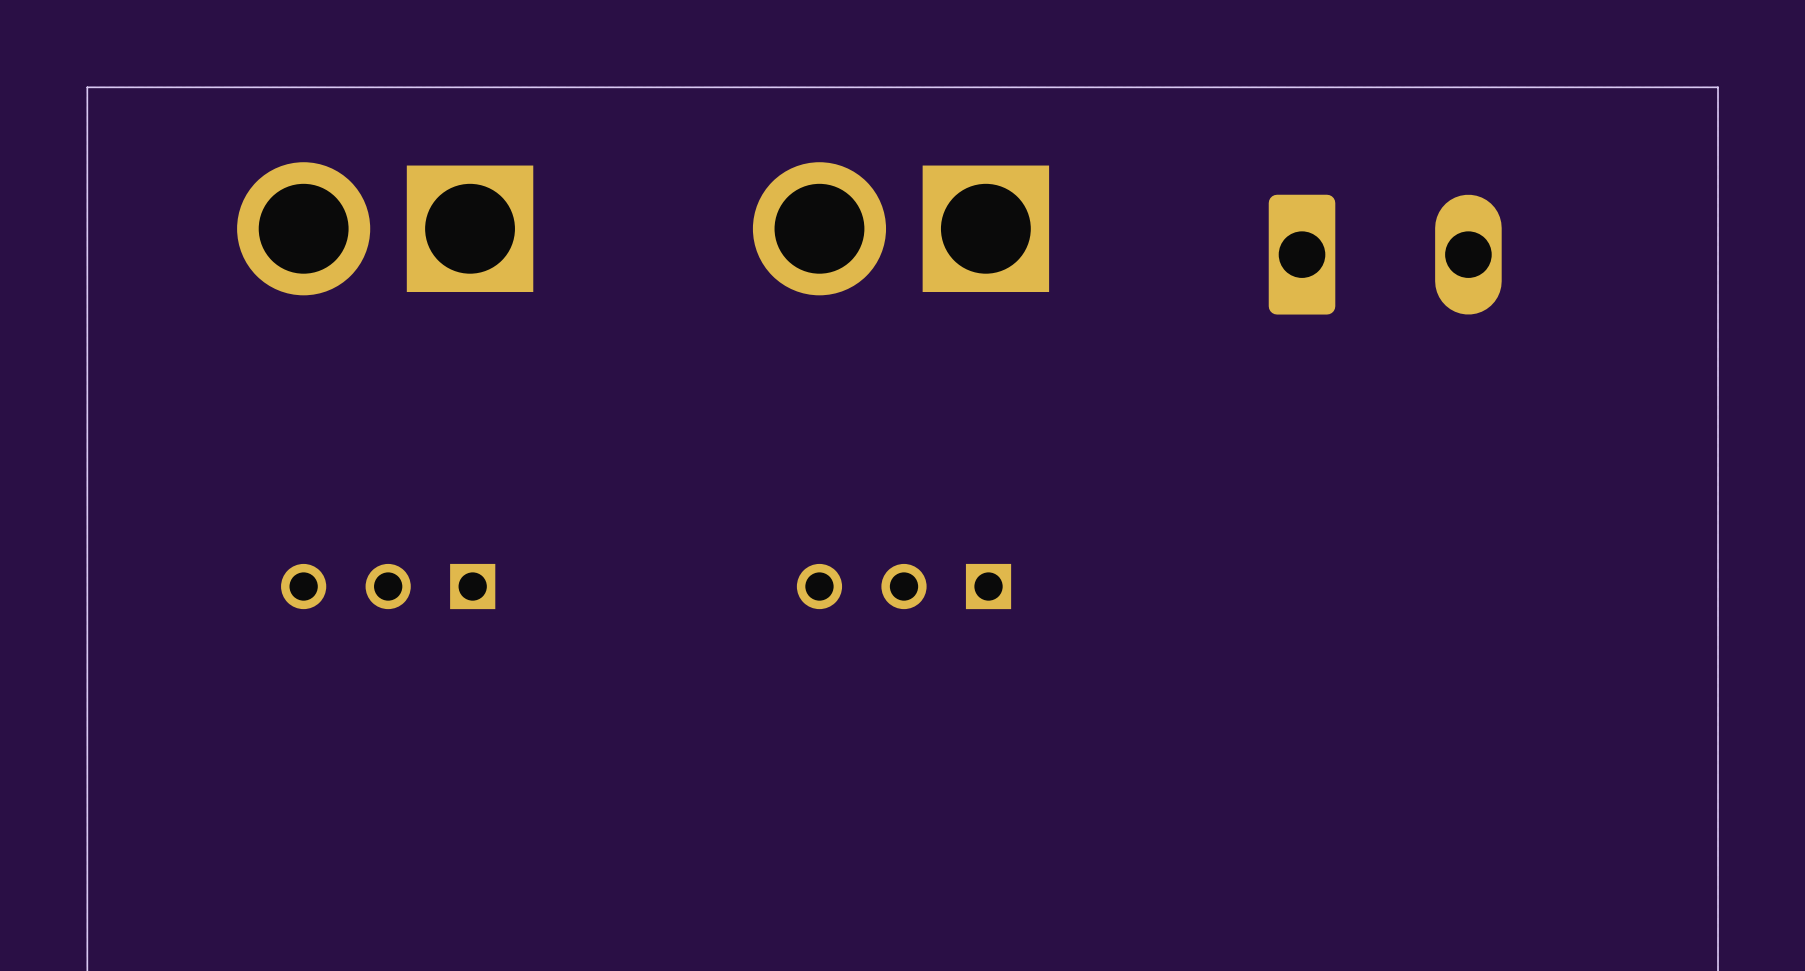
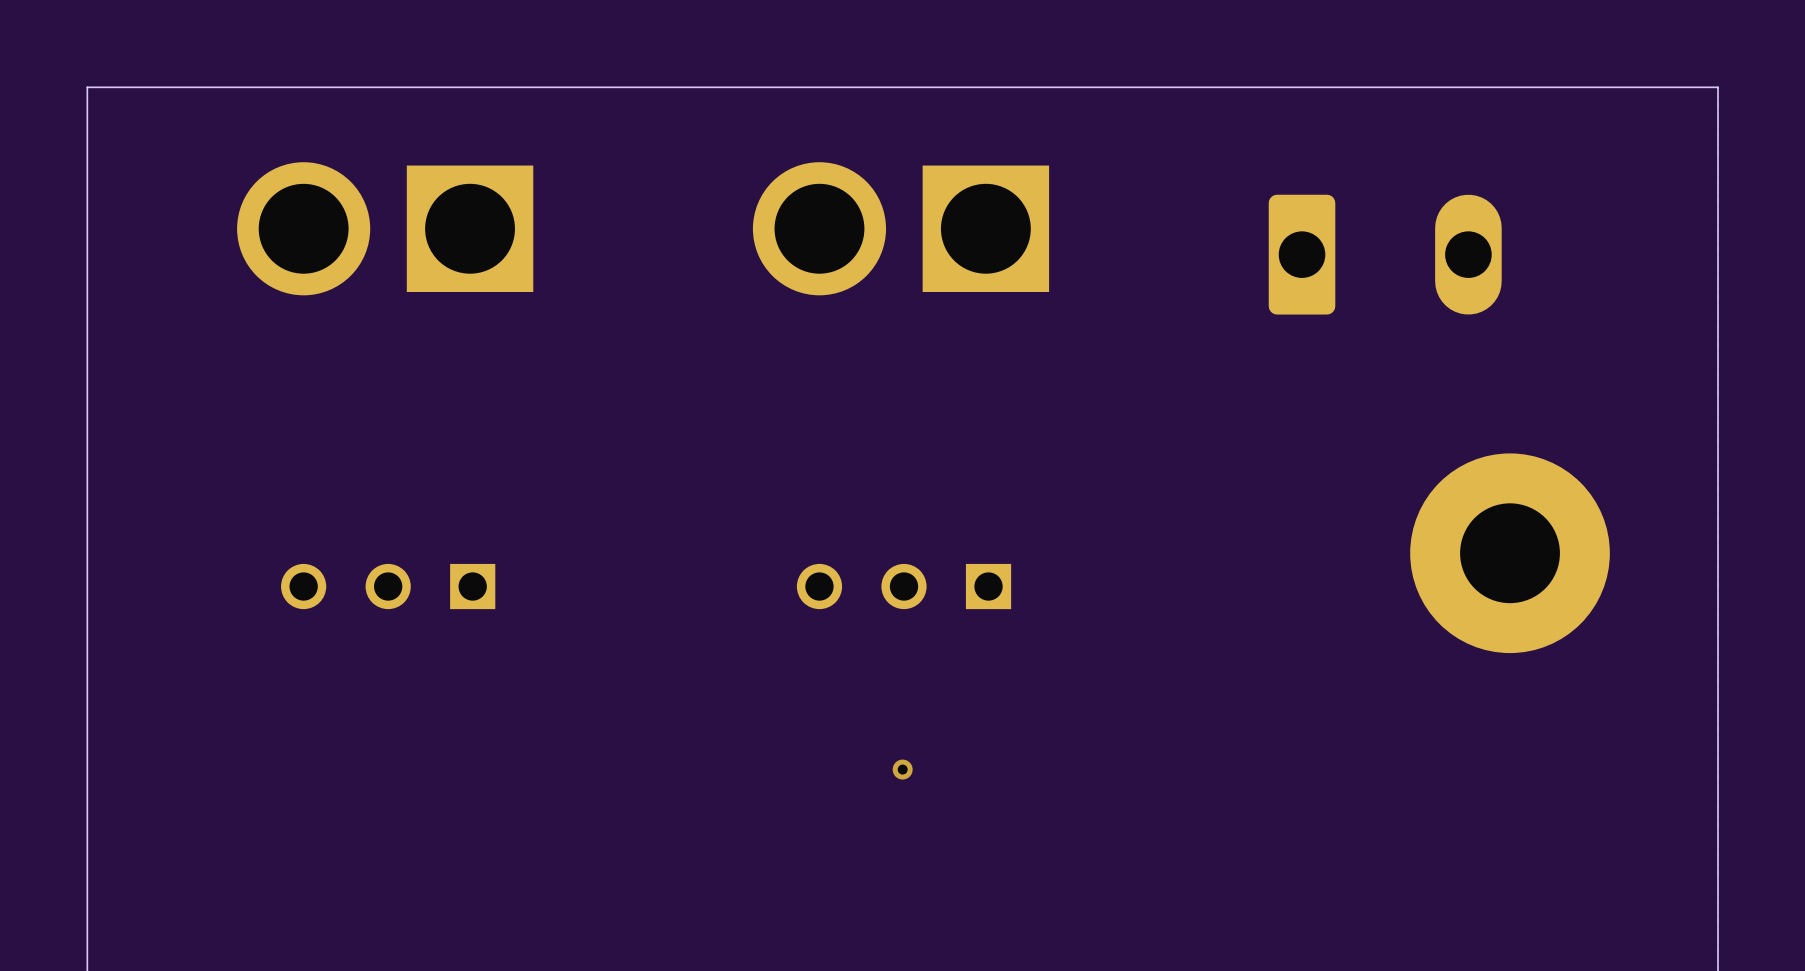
part: none -> (1510, 553)
via: none -> (902, 769)

